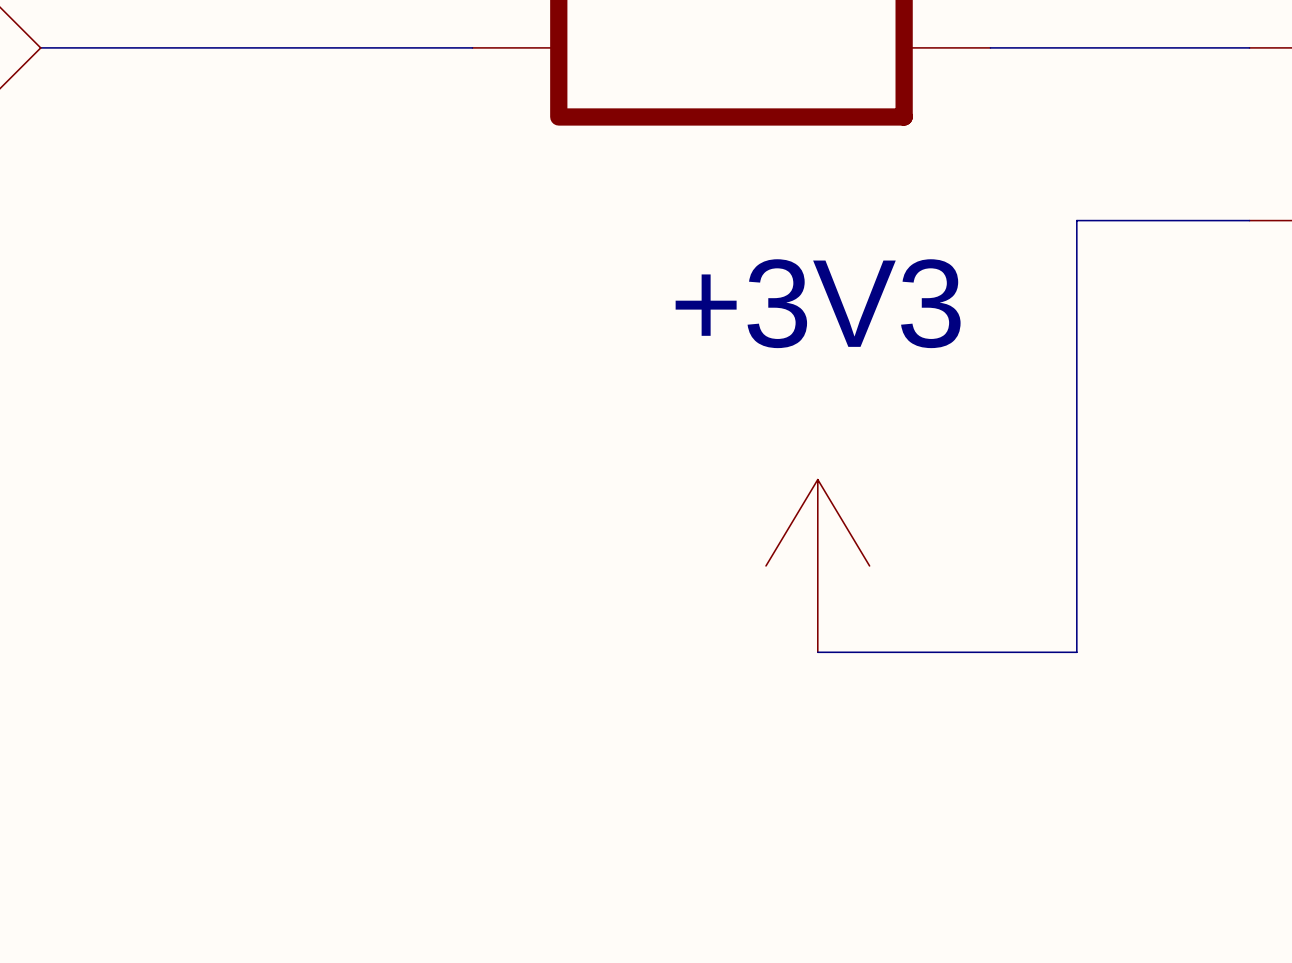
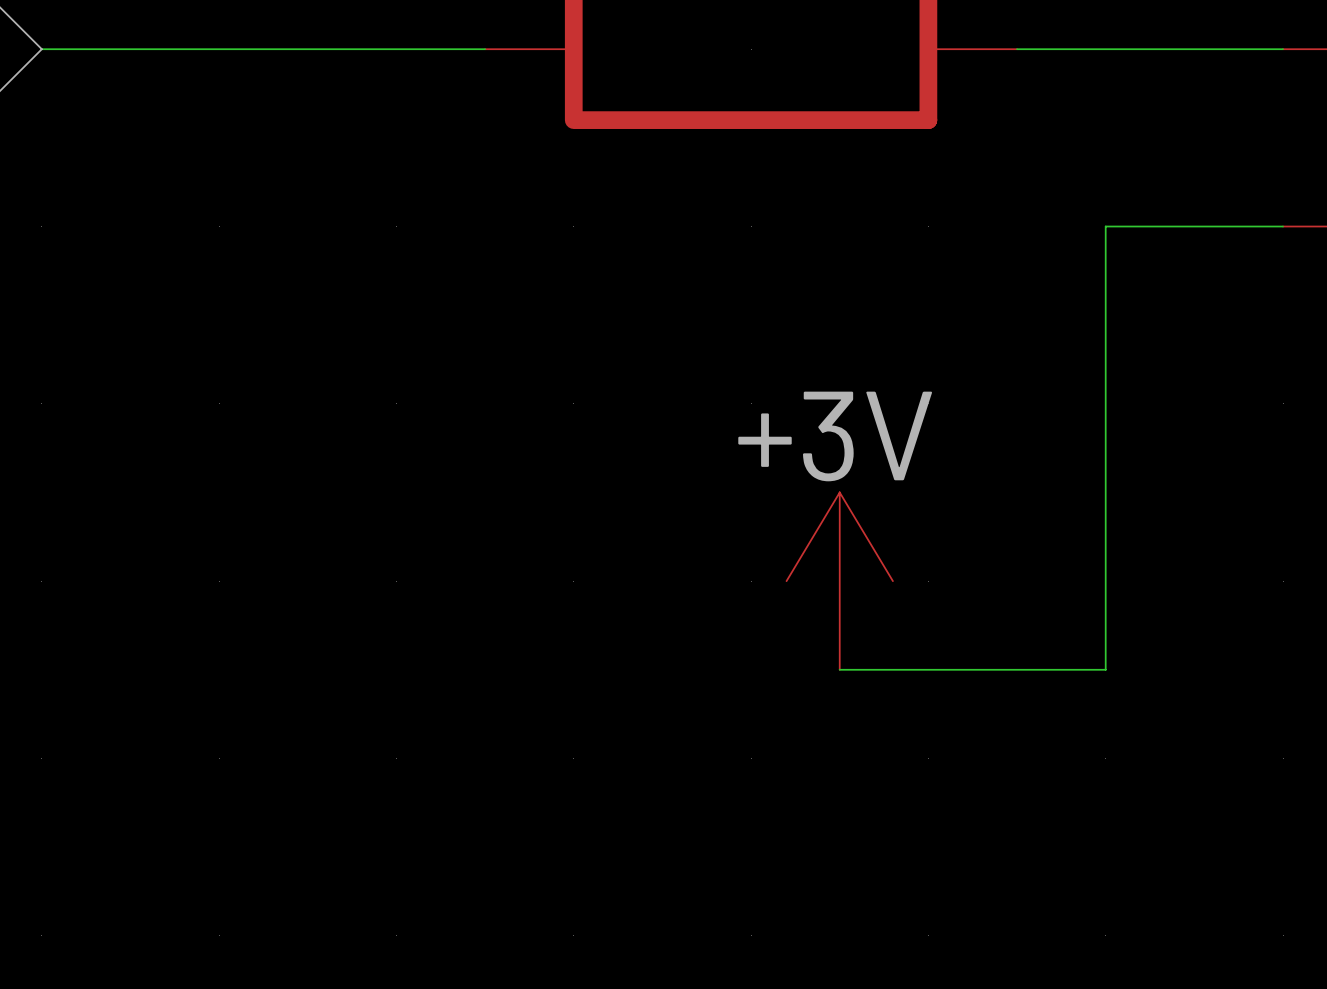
power symbol: +3V3 (817, 565) -> +3V (839, 581)

